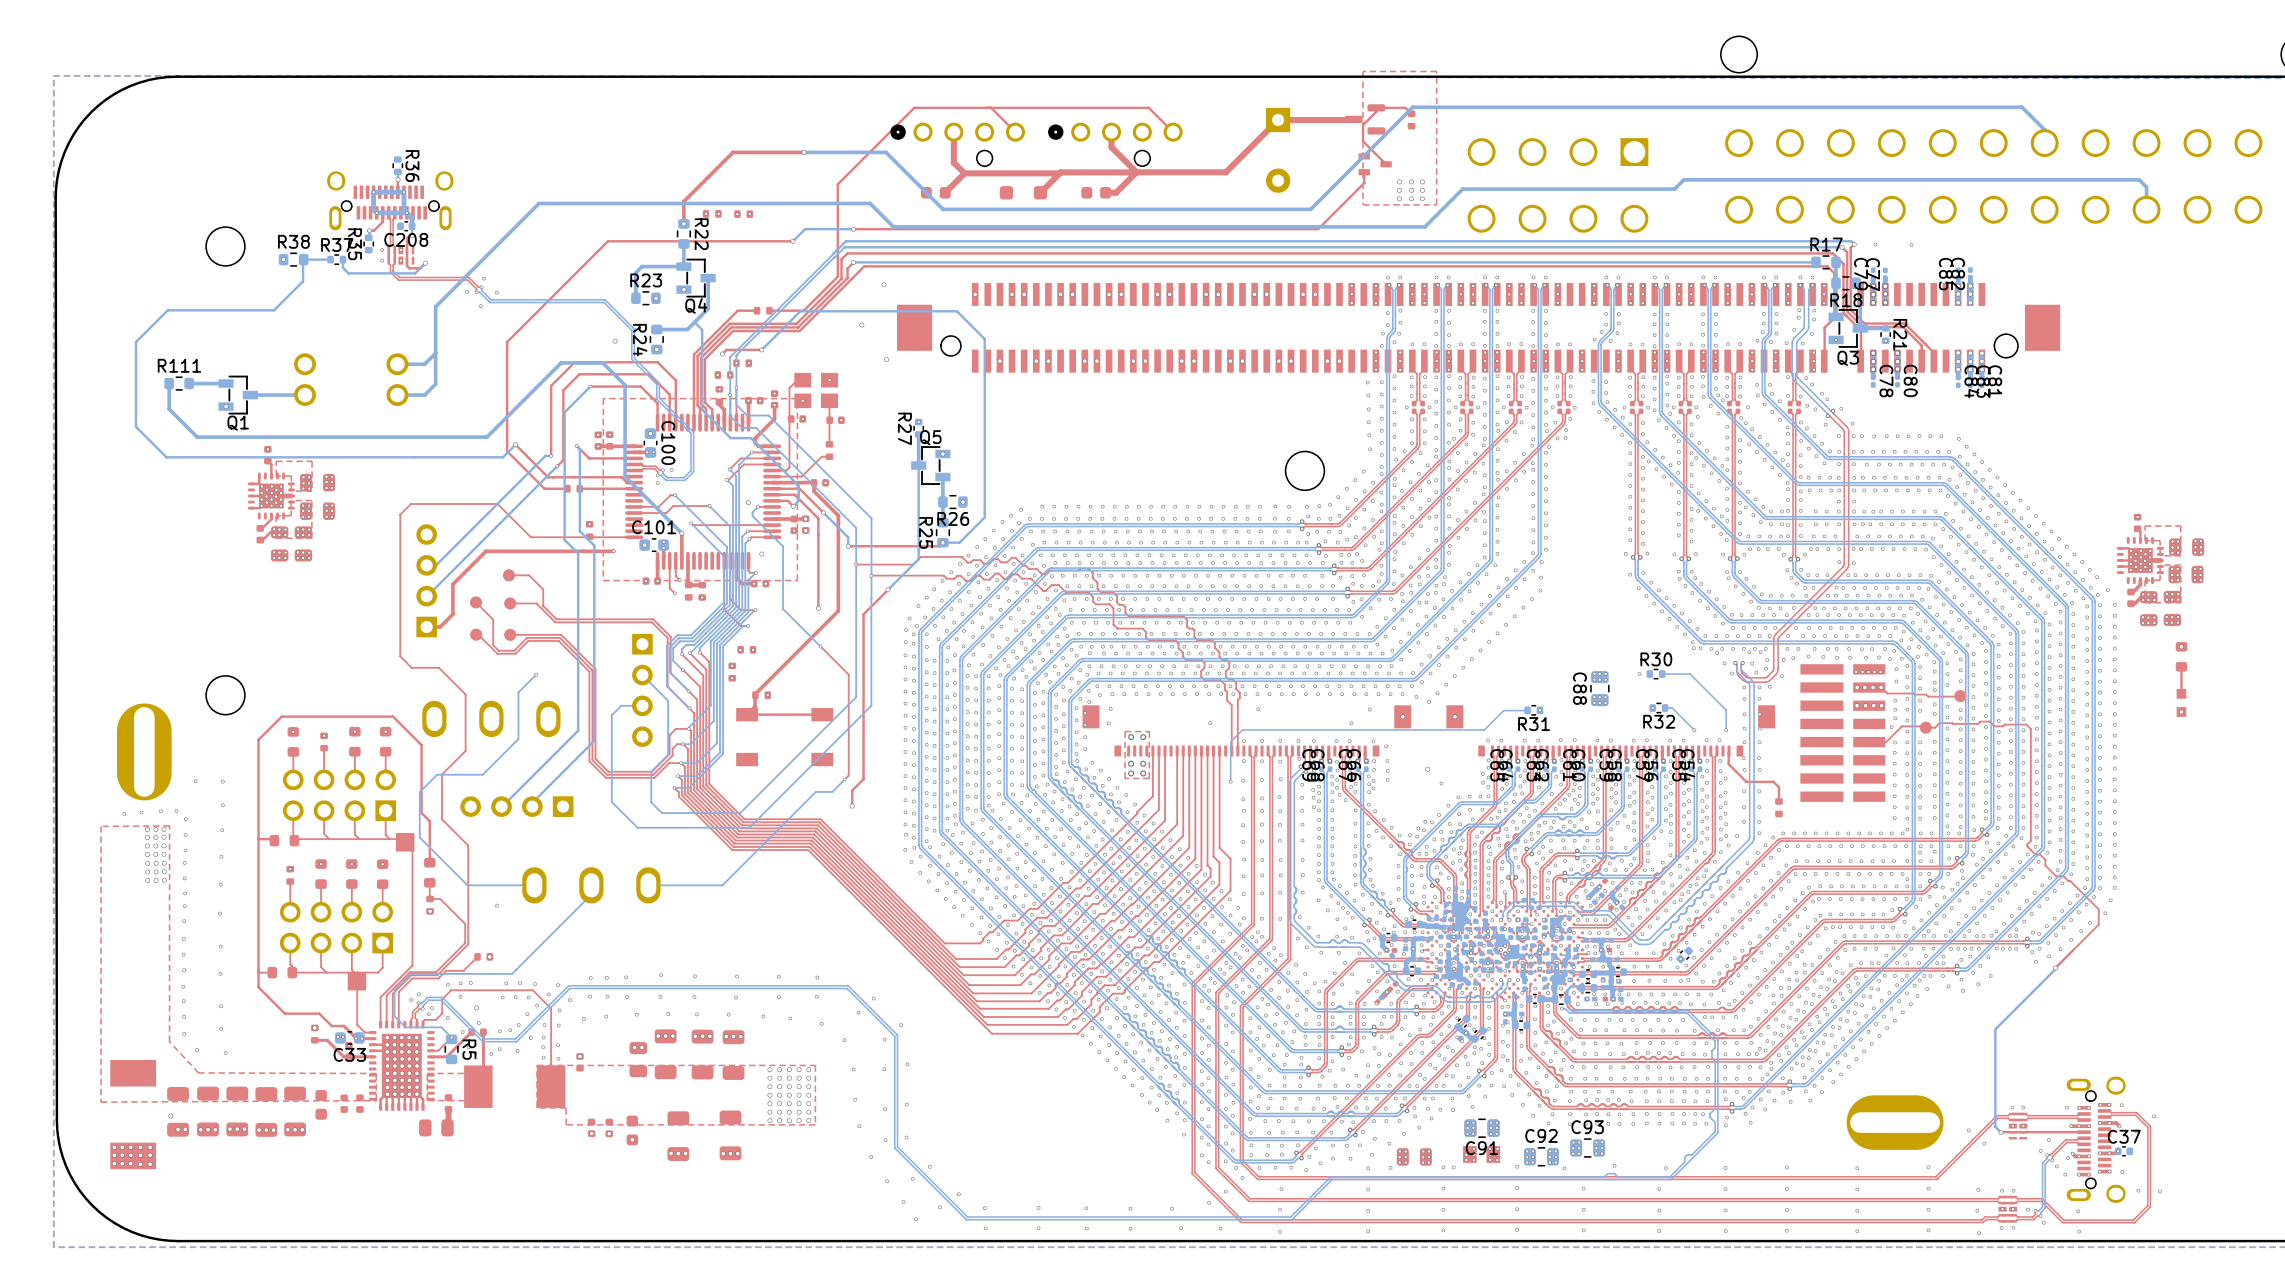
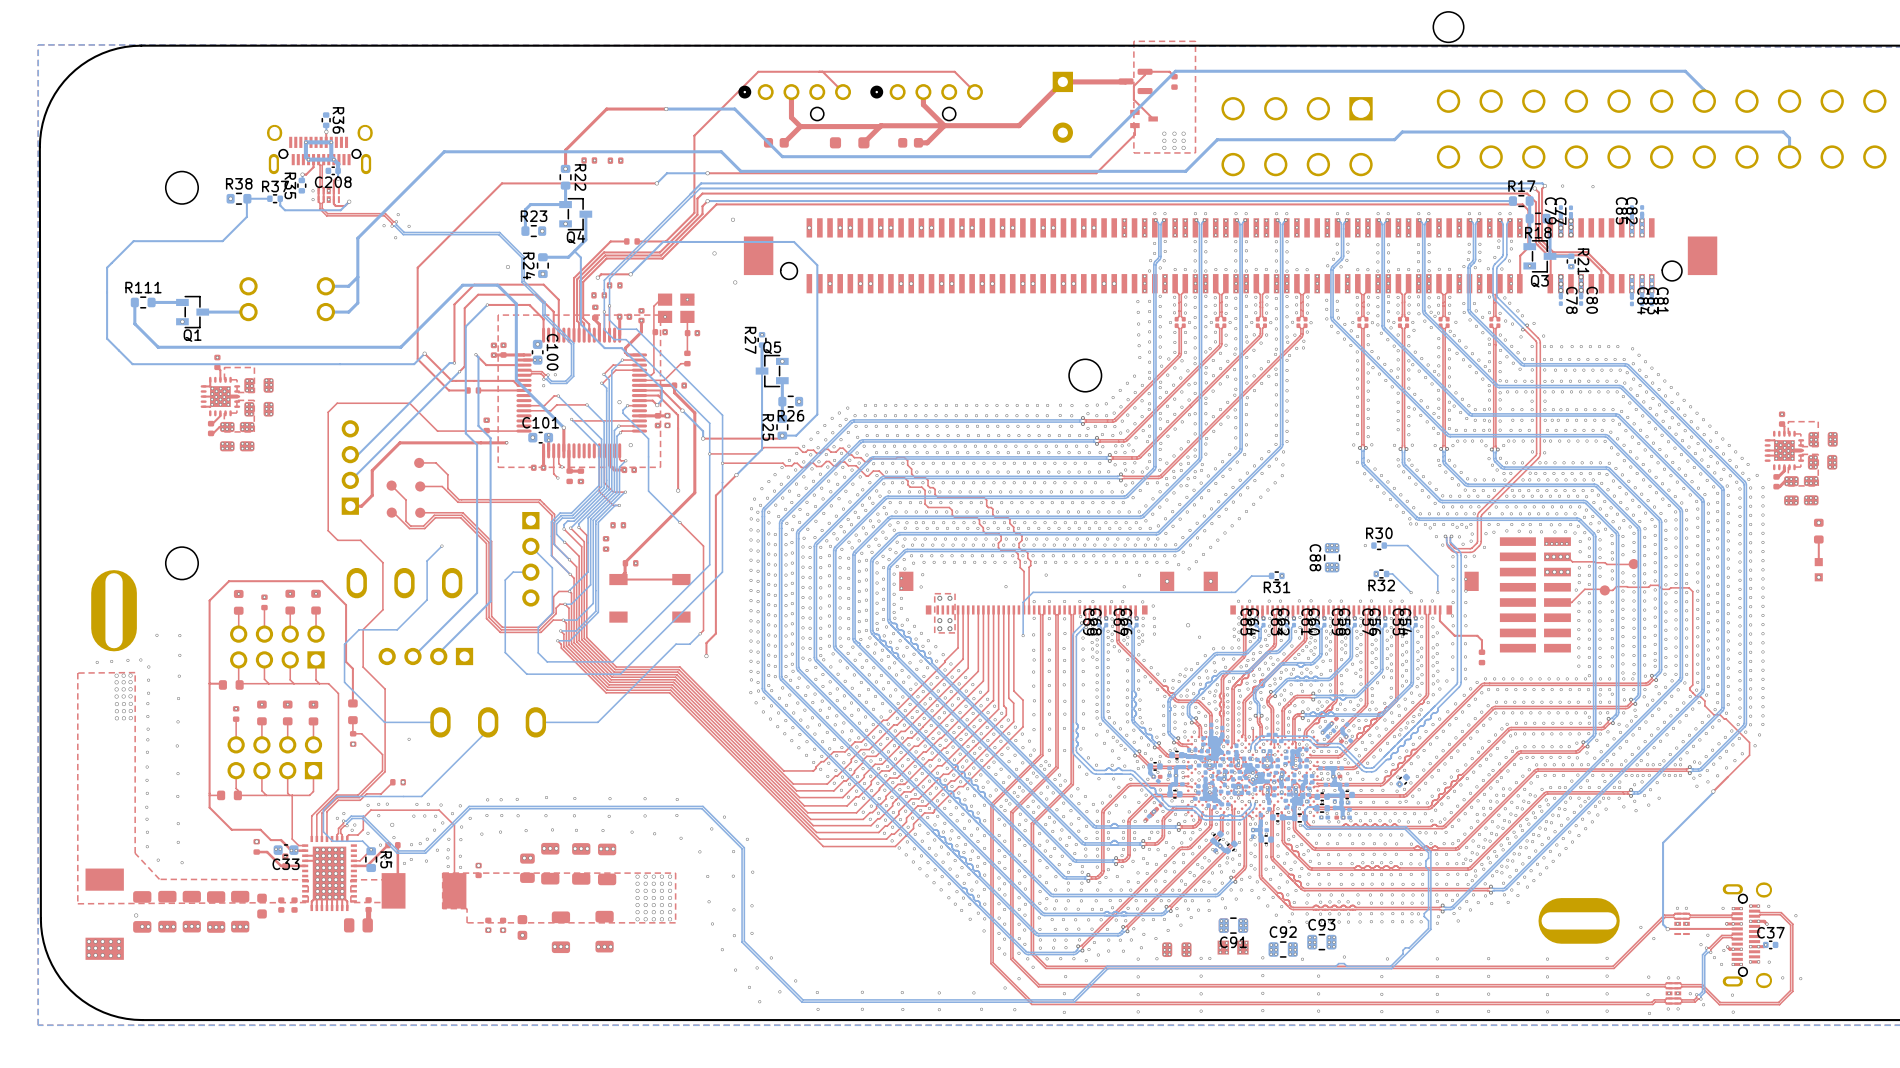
part: (405, 842) -> none
part: (356, 981) -> none

